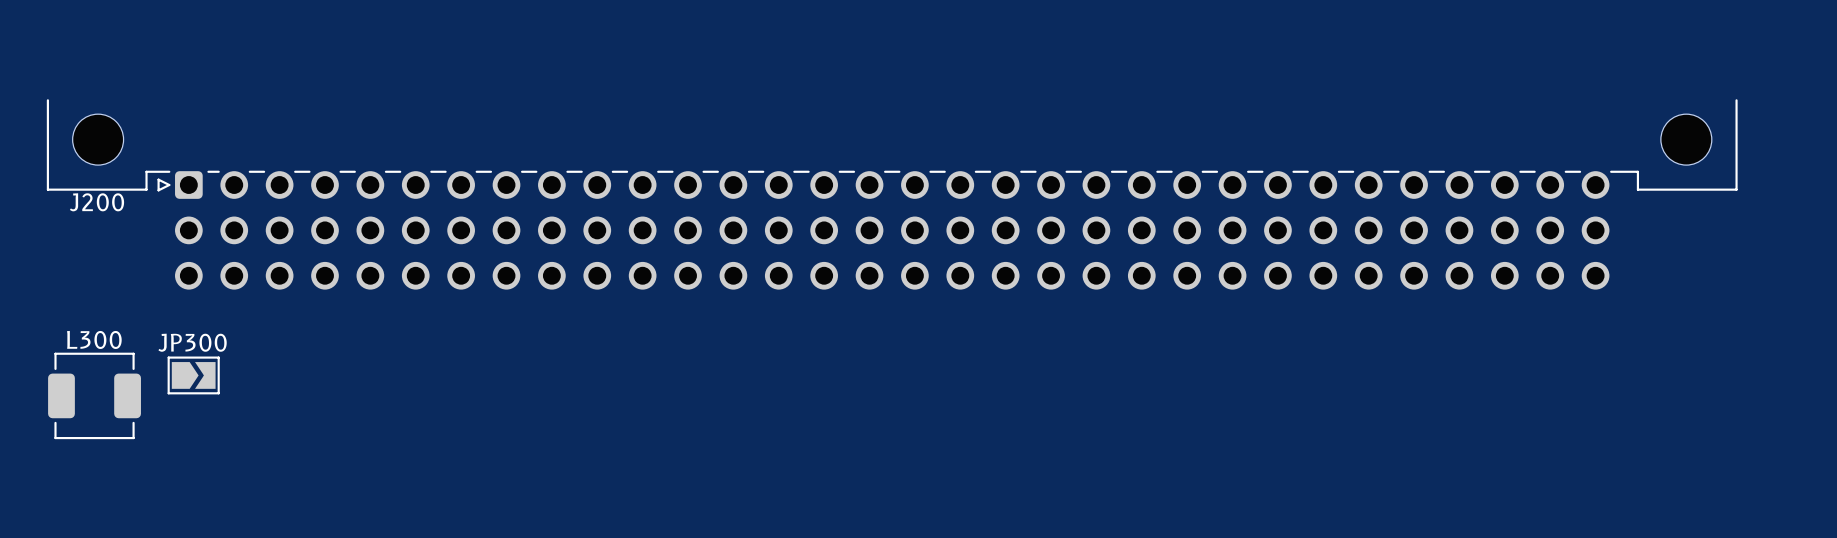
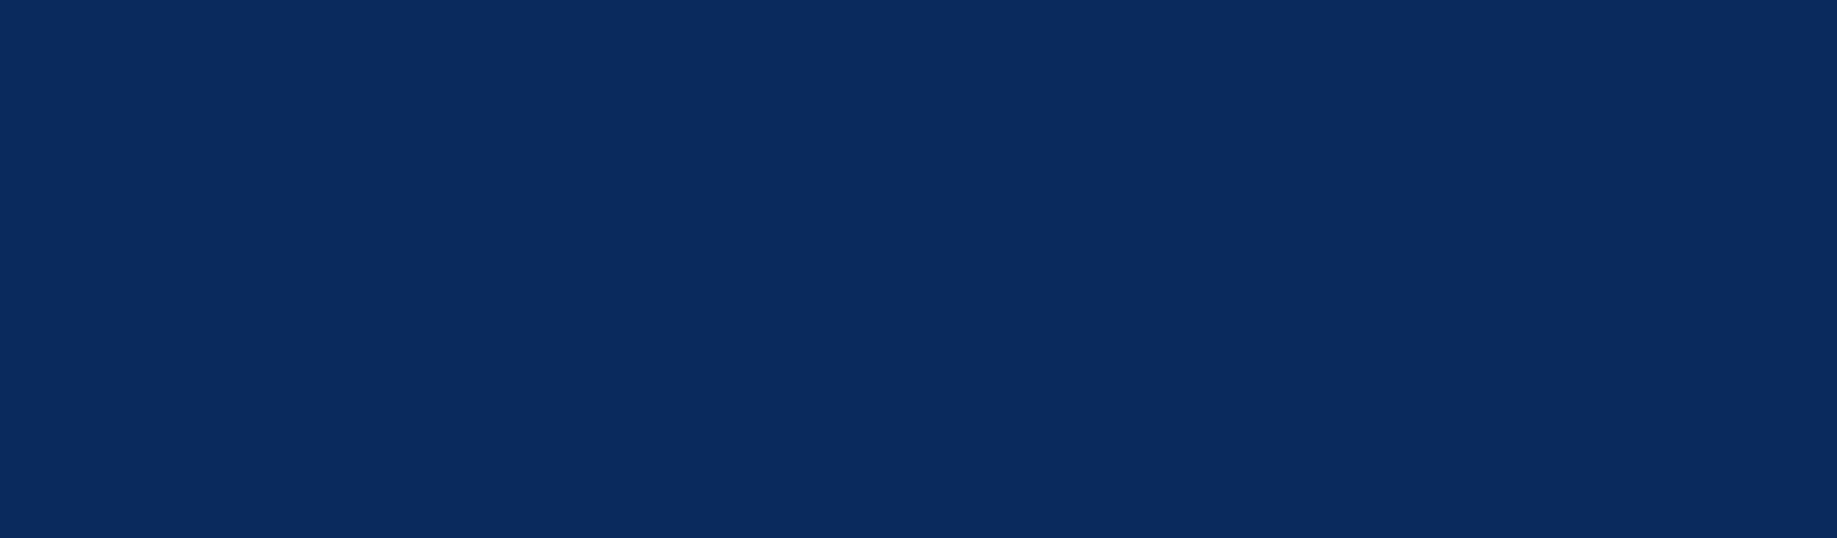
J200: (892, 194) -> none
JP300: (193, 375) -> none
L300: (94, 395) -> none

